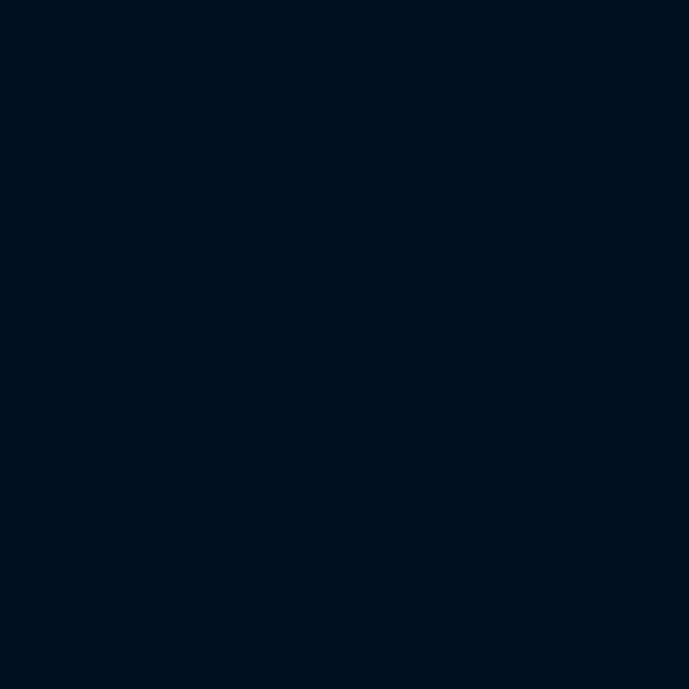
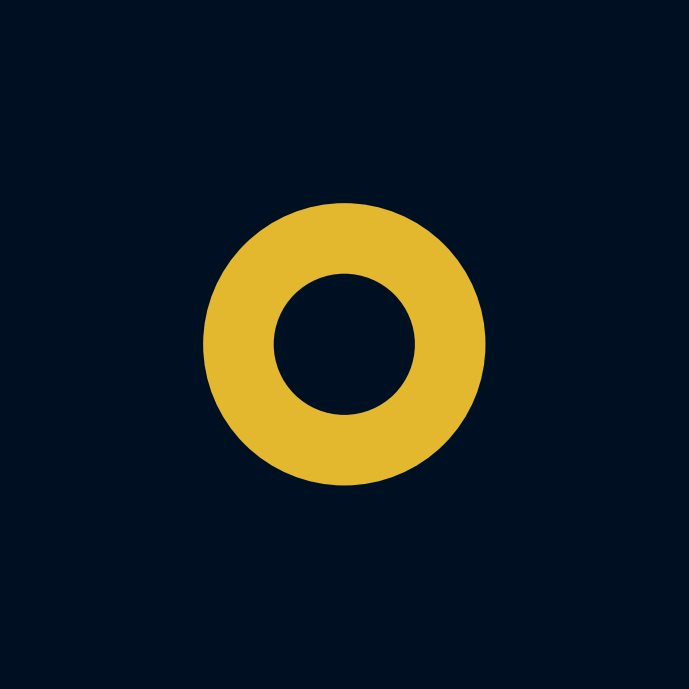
part: none -> (344, 344)

